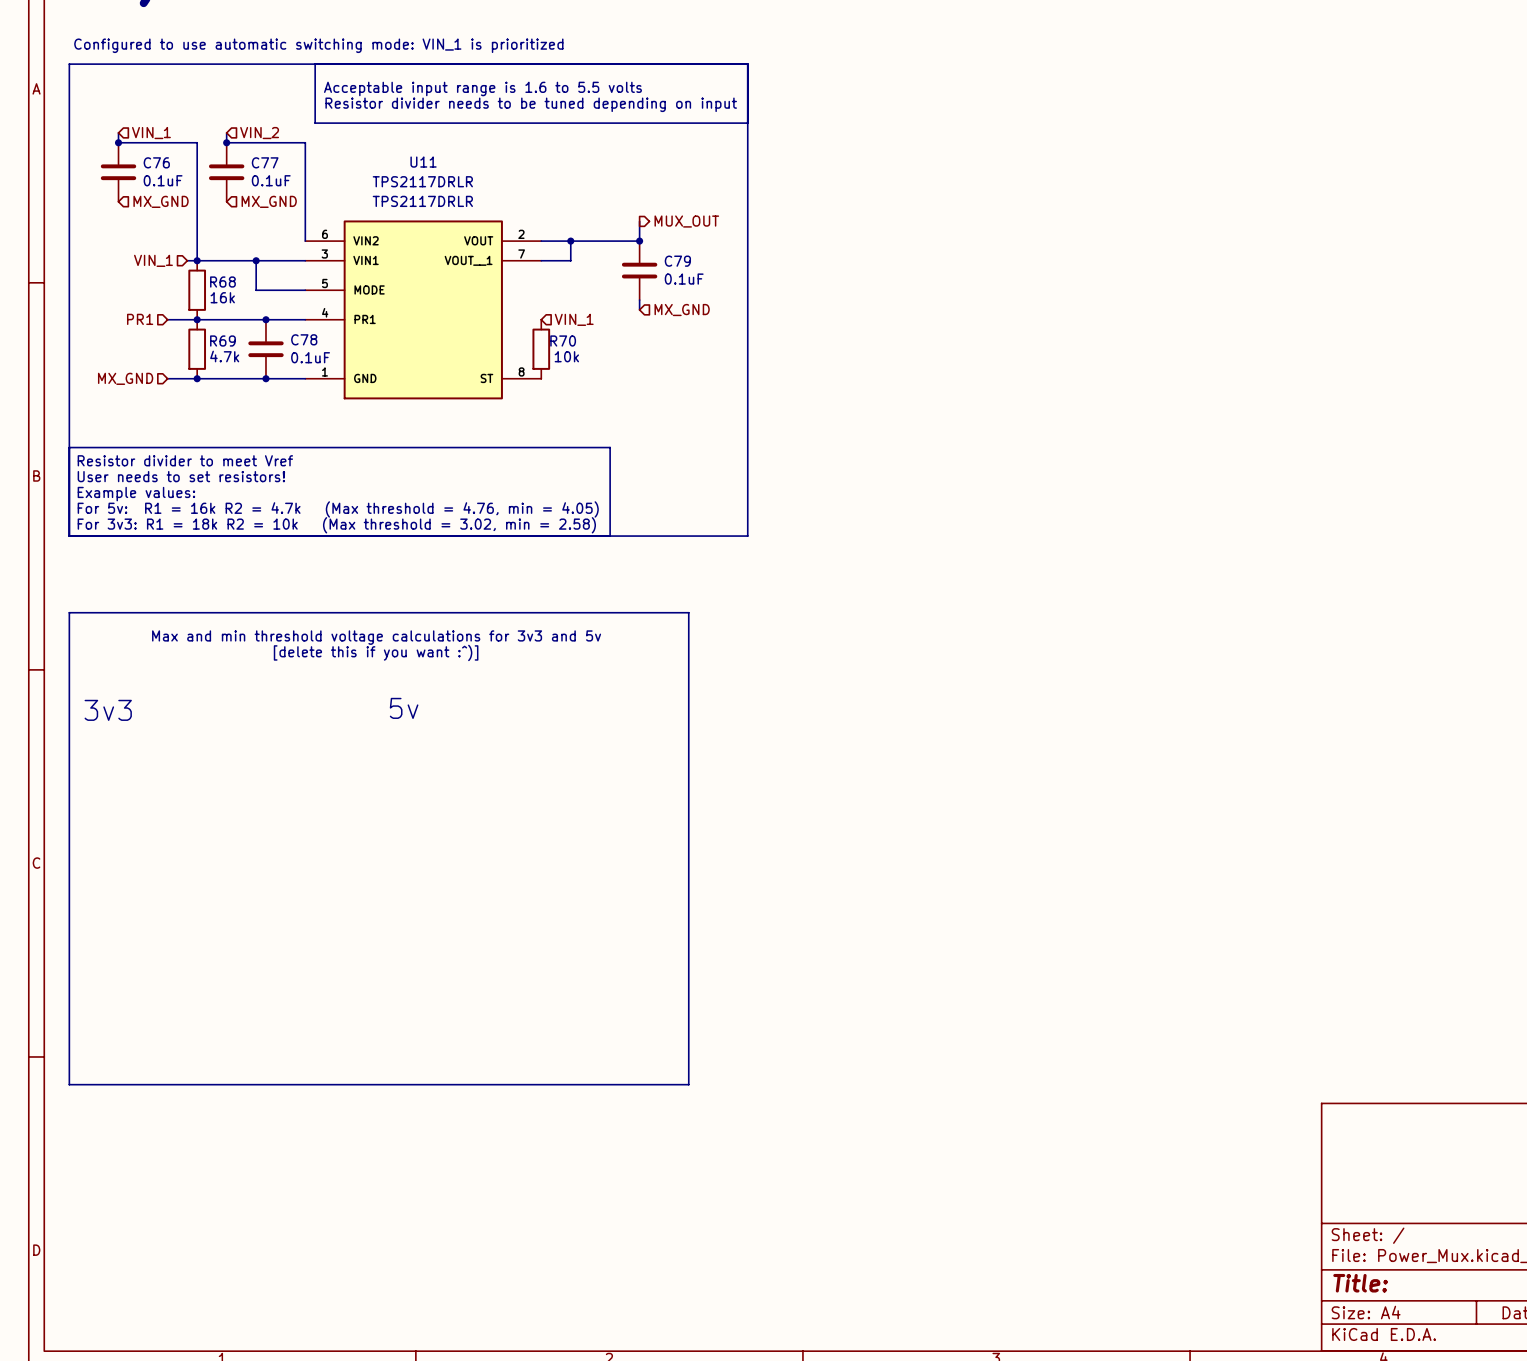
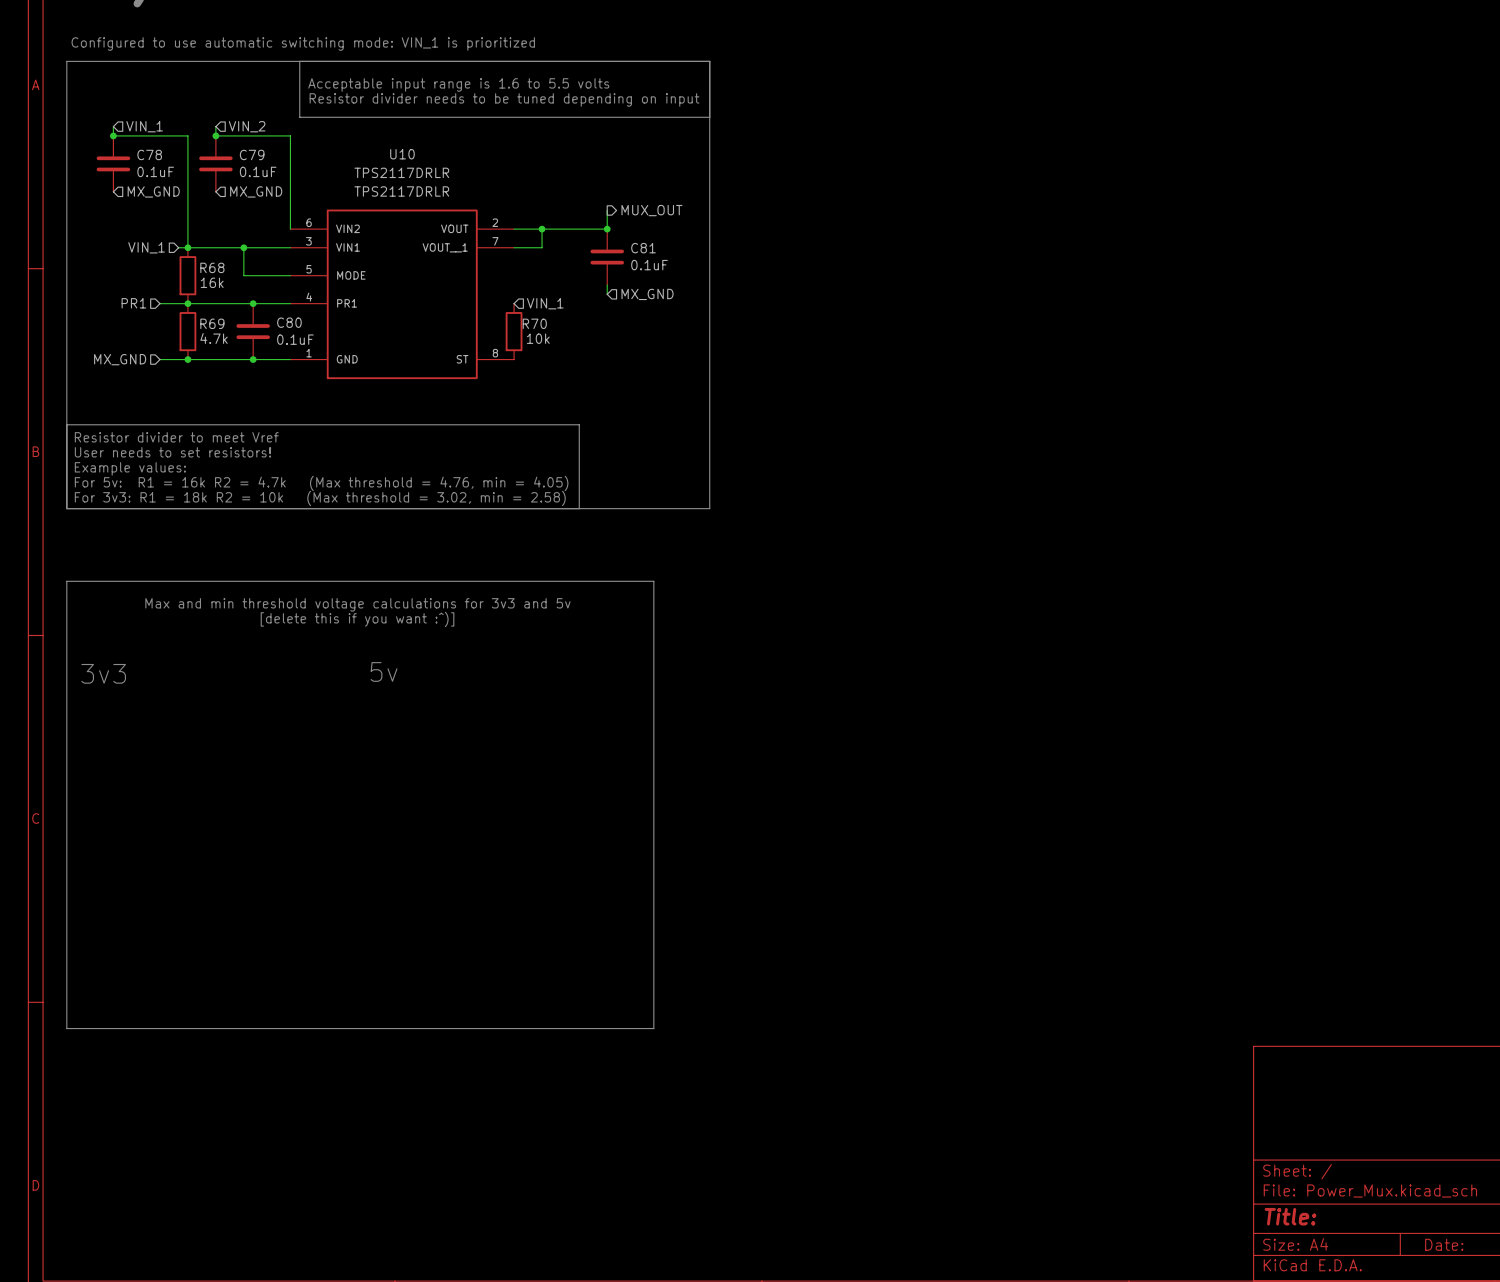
C76 name: C76 (156, 162) -> C78 (149, 154)
C77 name: C77 (265, 162) -> C79 (252, 154)
U11 name: U11 (423, 162) -> U10 (402, 154)
C79 name: C79 (677, 261) -> C81 (643, 248)
C78 name: C78 (304, 339) -> C80 (289, 322)

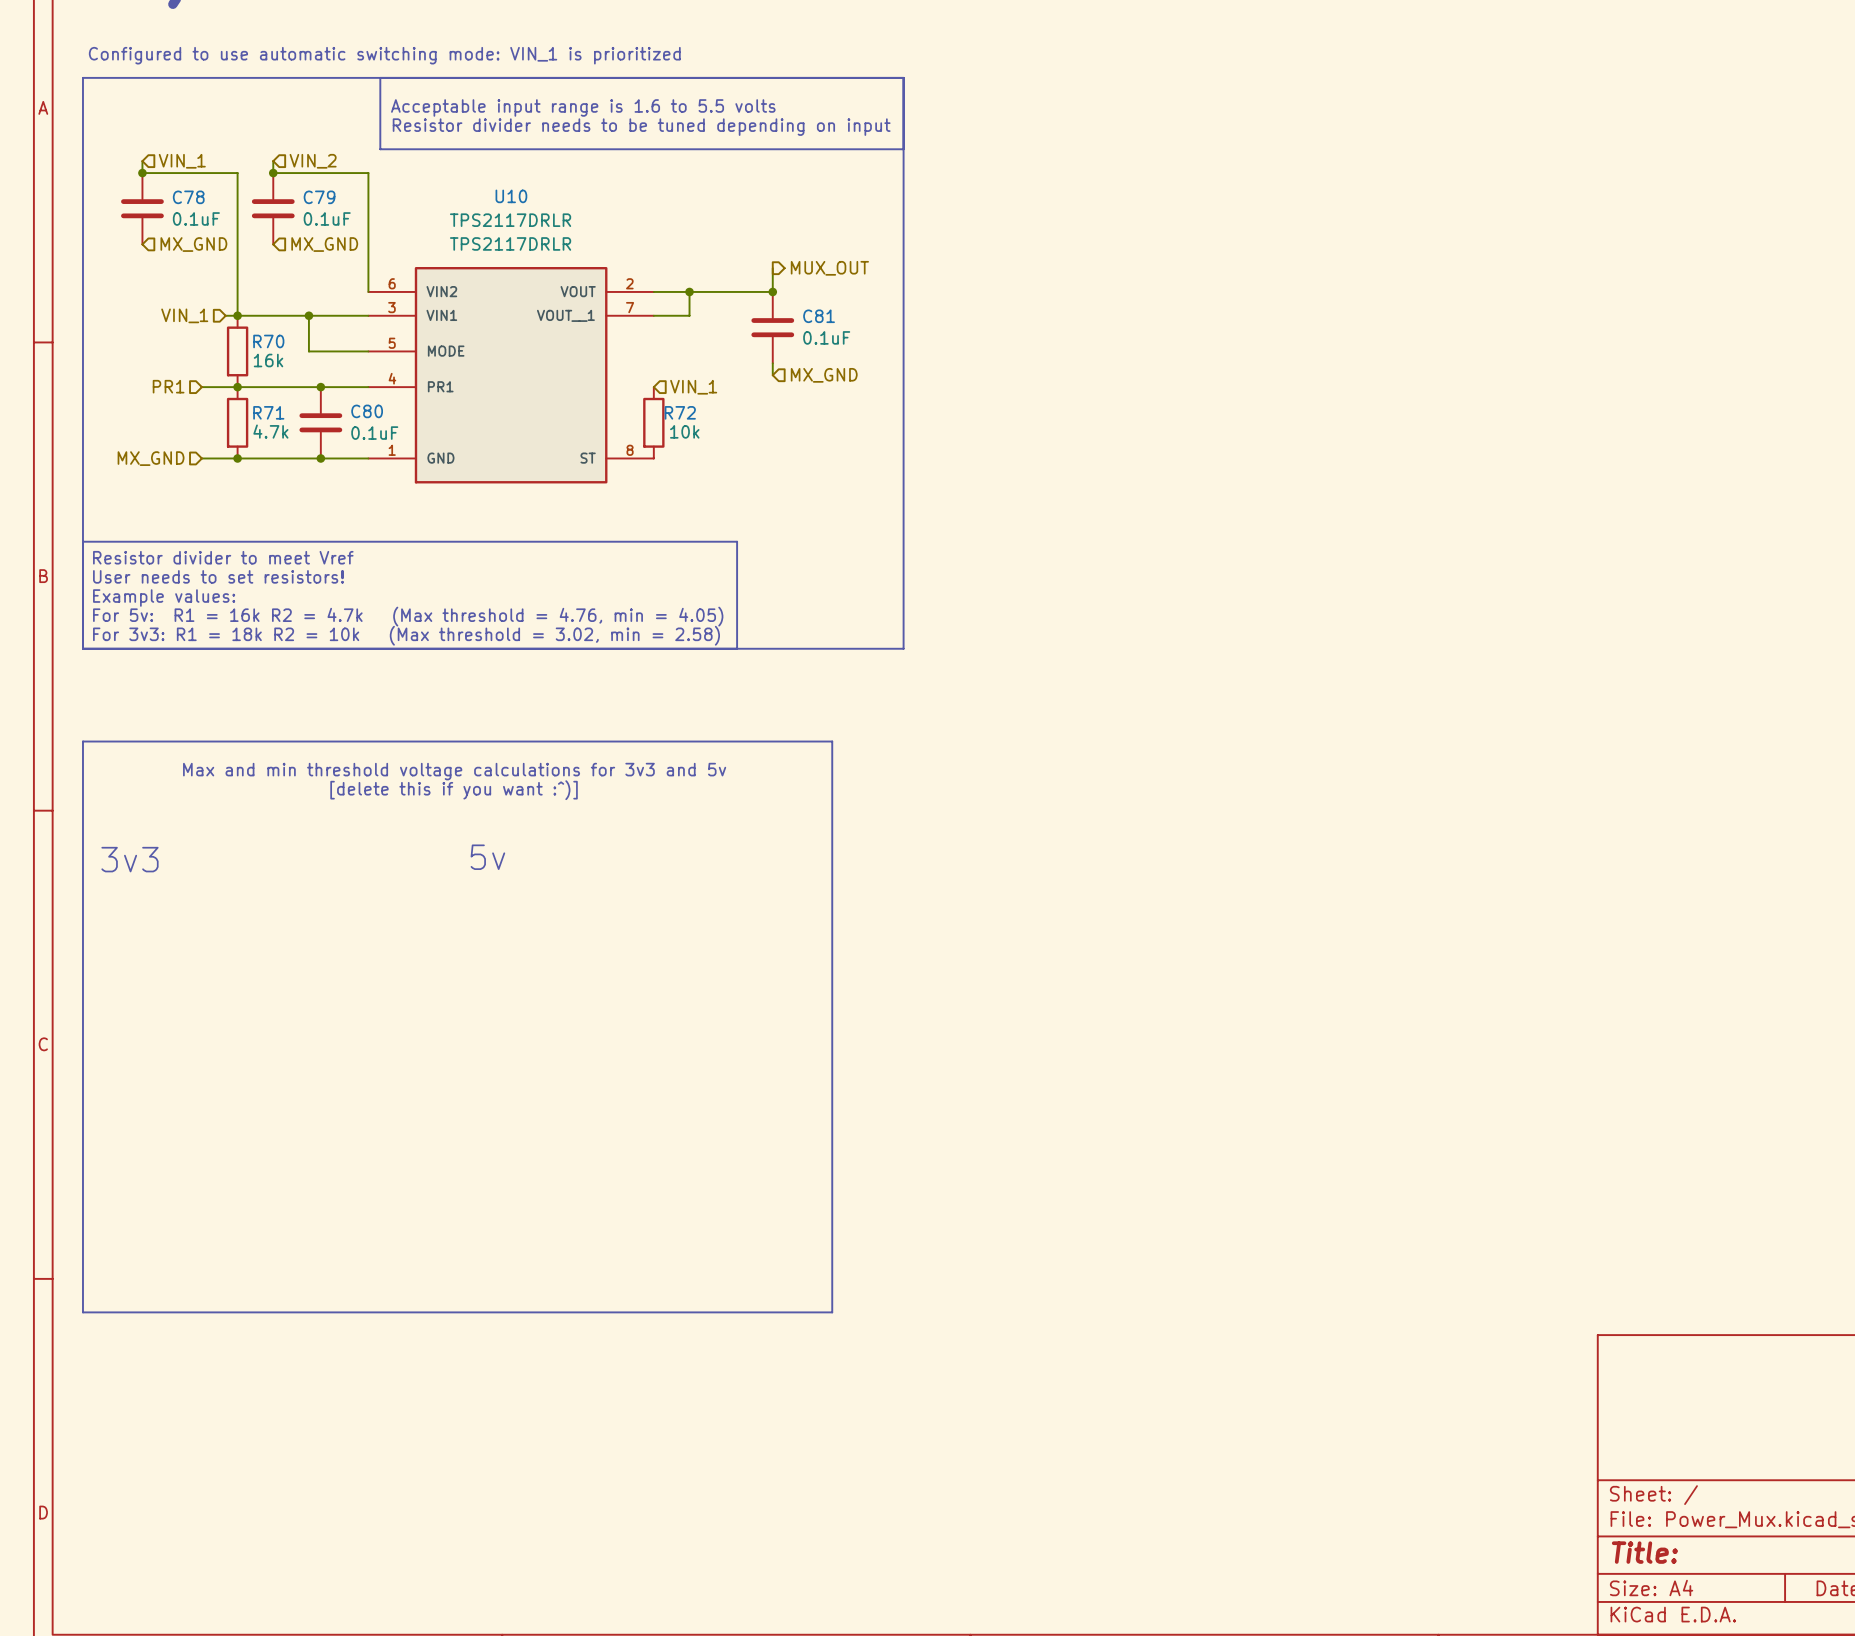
R68 name: R68 (212, 267) -> R70 (268, 341)
R69 name: R69 (212, 323) -> R71 (268, 412)
R70 name: R70 (534, 323) -> R72 (680, 412)

